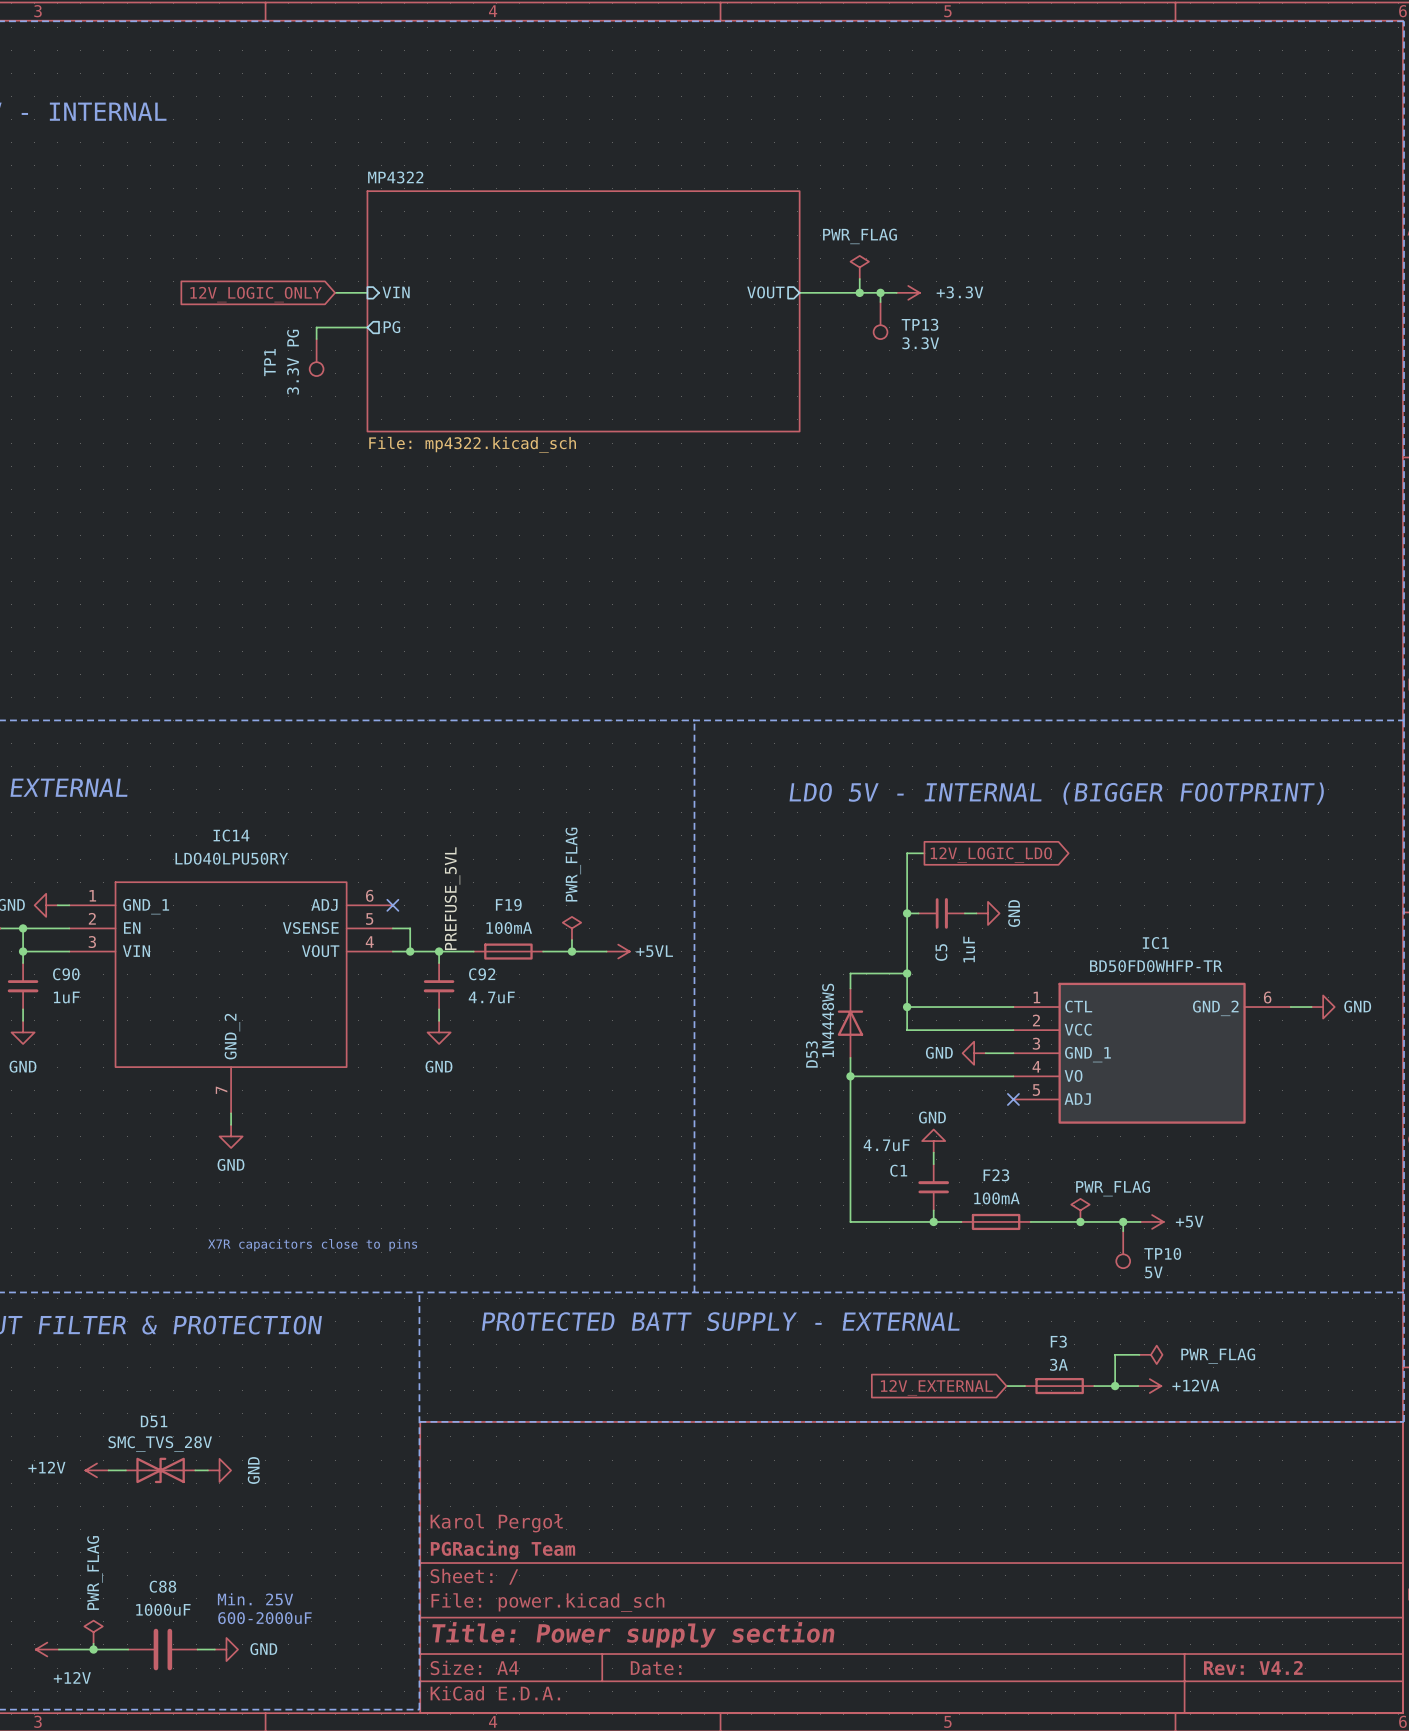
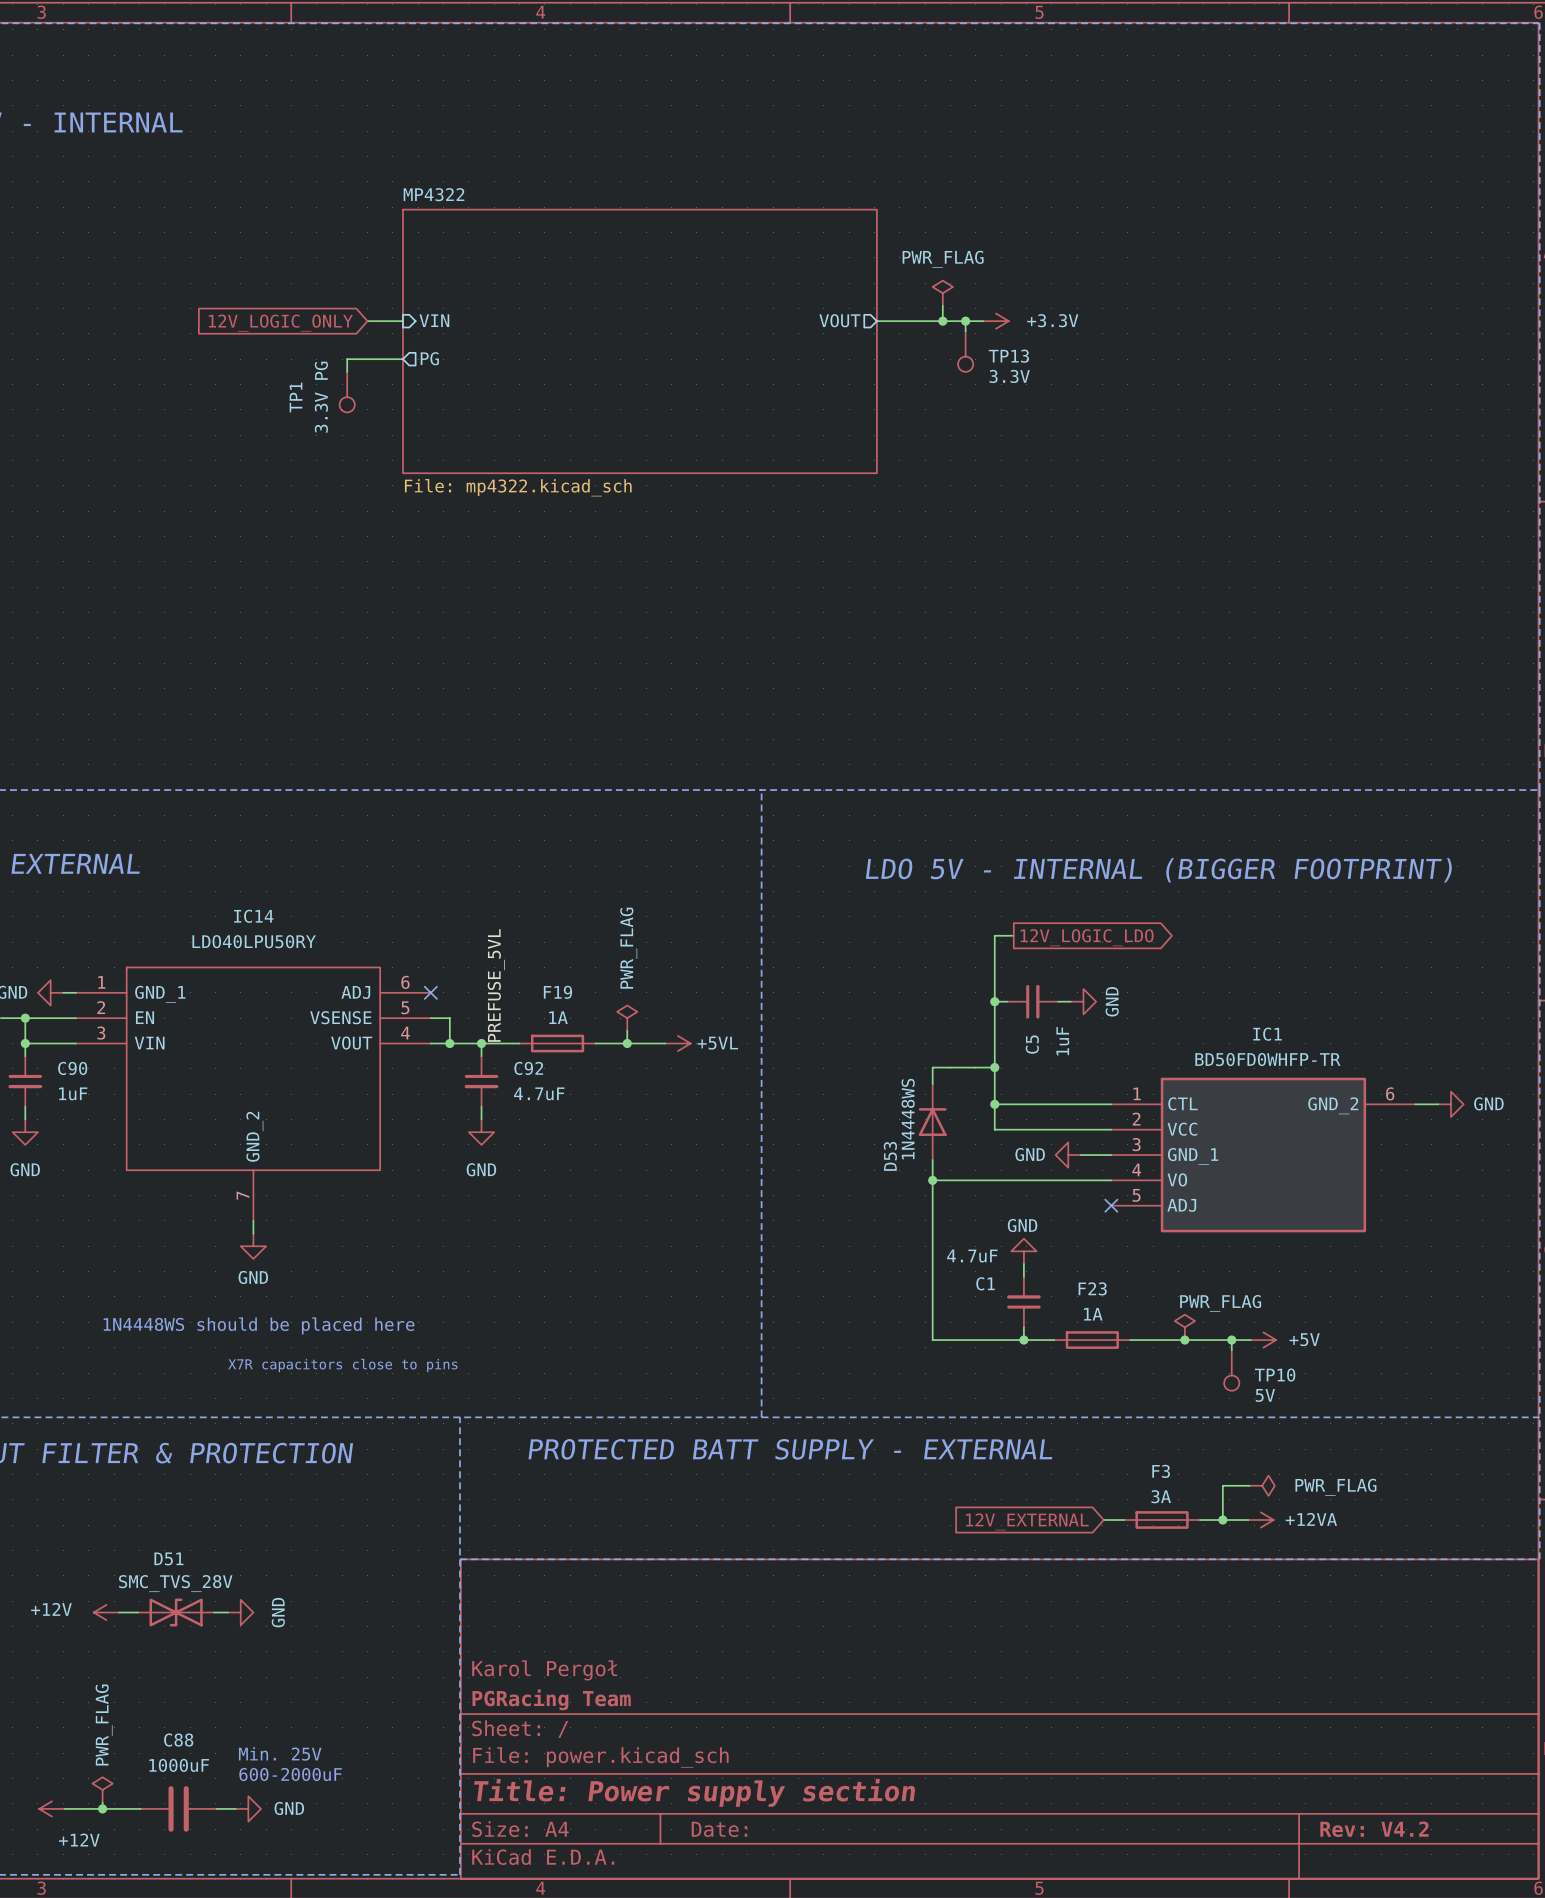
F19 value: 100mA (509, 928) -> 1A (558, 1017)
F23 value: 100mA (996, 1198) -> 1A (1093, 1314)
text: none -> 1N4448WS should be placed here (259, 1325)

